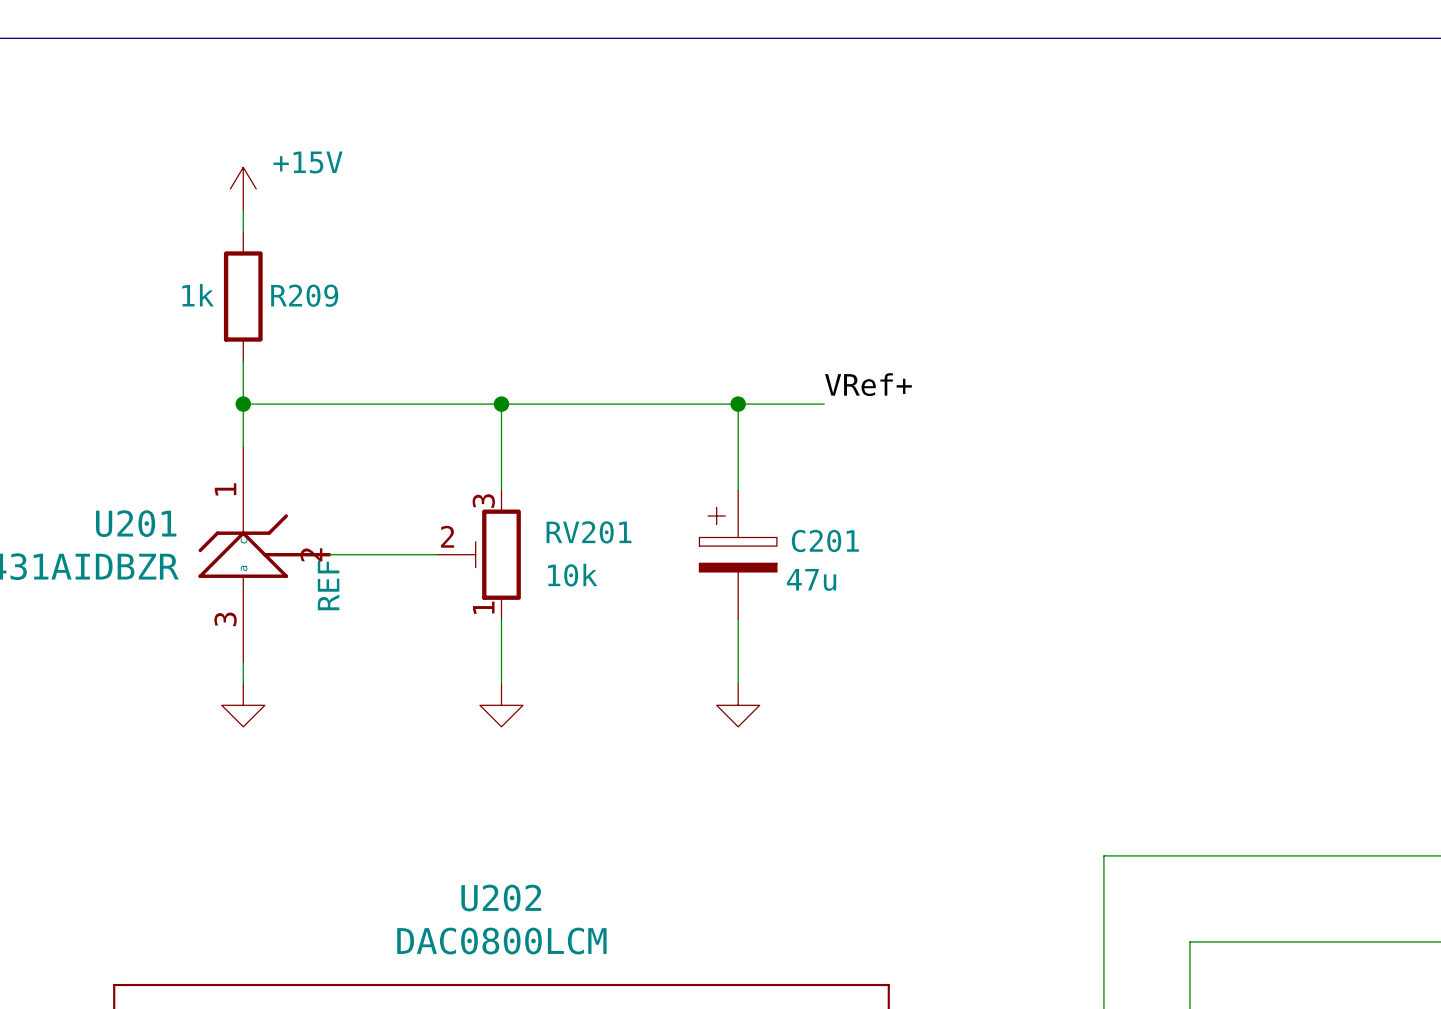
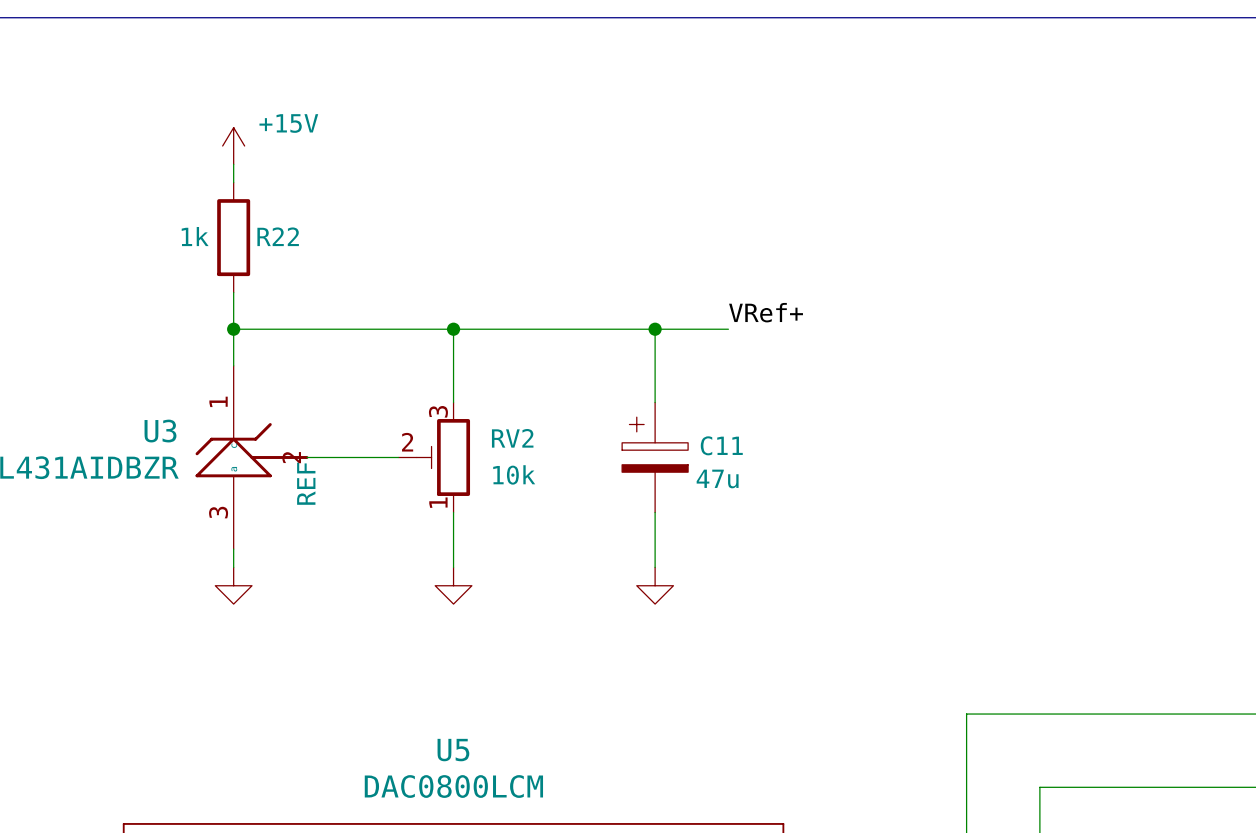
R209 name: R209 (304, 295) -> R22 (278, 236)
U201 name: U201 (136, 523) -> U3 (160, 431)
RV201 name: RV201 (588, 532) -> RV2 (512, 438)
C201 name: C201 (825, 541) -> C11 (721, 445)
U202 name: U202 (501, 898) -> U5 (453, 750)

